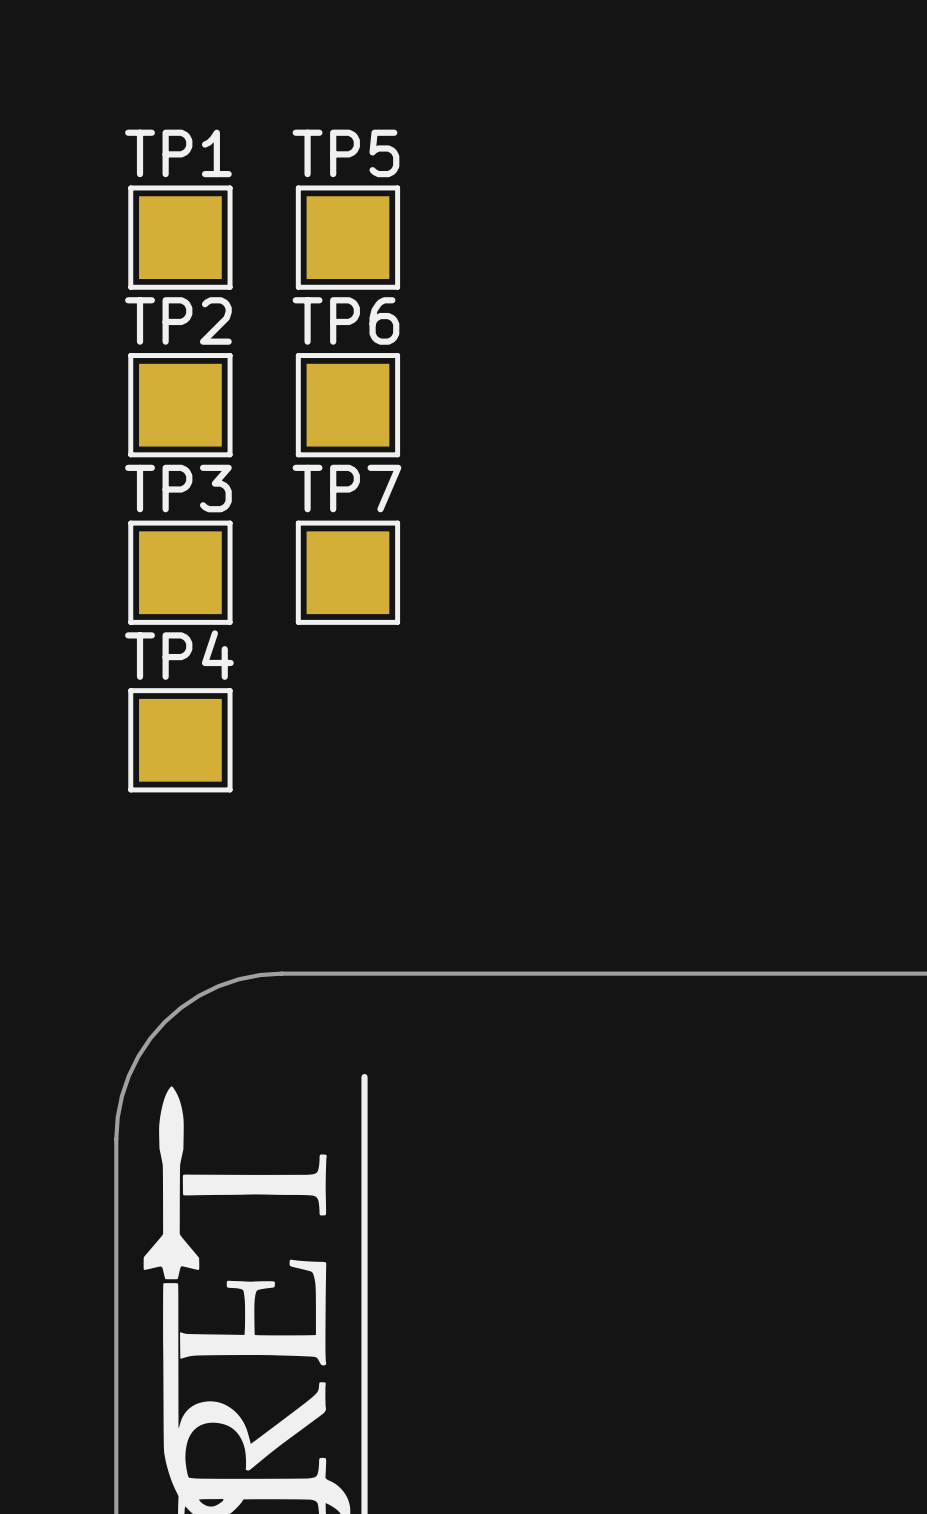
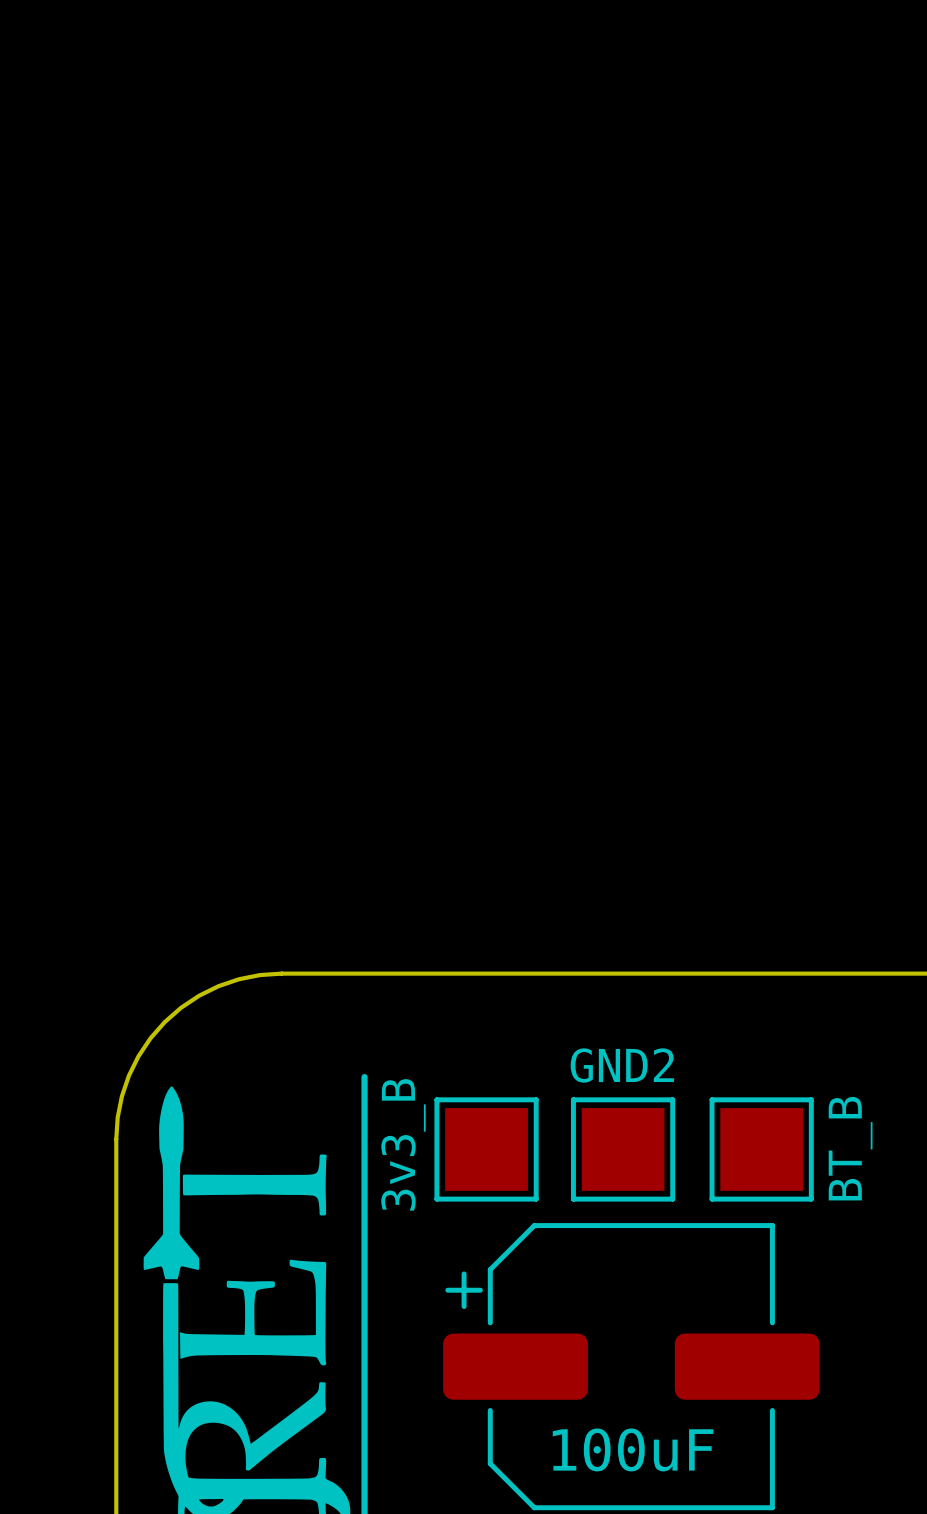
TP1: (180, 237) -> none
TP5: (347, 237) -> none
TP2: (180, 405) -> none
TP6: (347, 405) -> none
TP3: (180, 572) -> none
TP7: (347, 572) -> none
TP4: (180, 740) -> none
part: none -> 3v3_B (486, 1149)
part: none -> GND2 (623, 1149)
part: none -> BT_B (761, 1149)
part: none -> 100uF (631, 1366)

